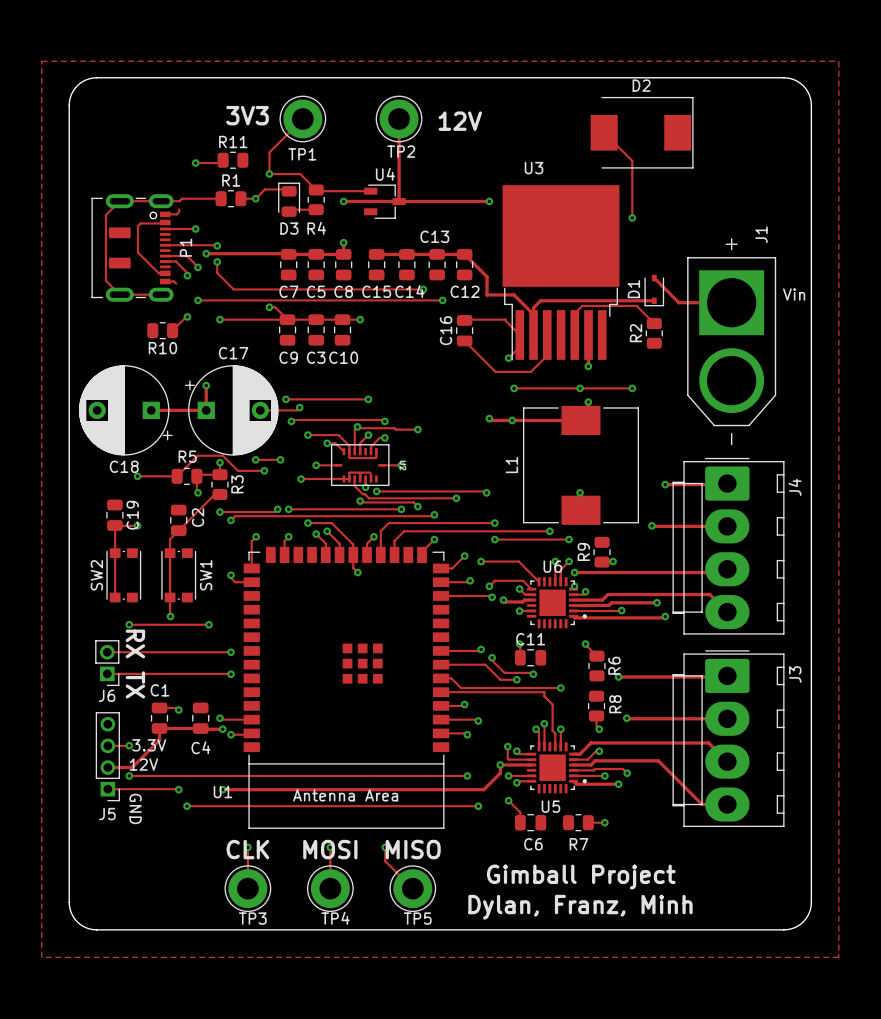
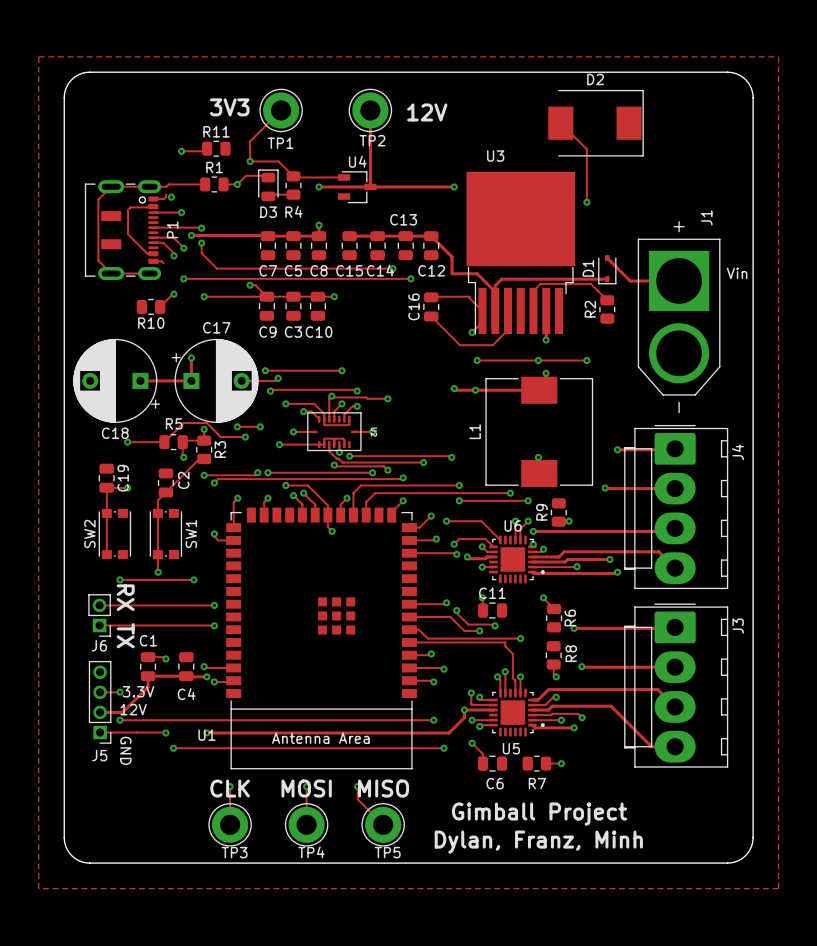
via: none -> (171, 197)

